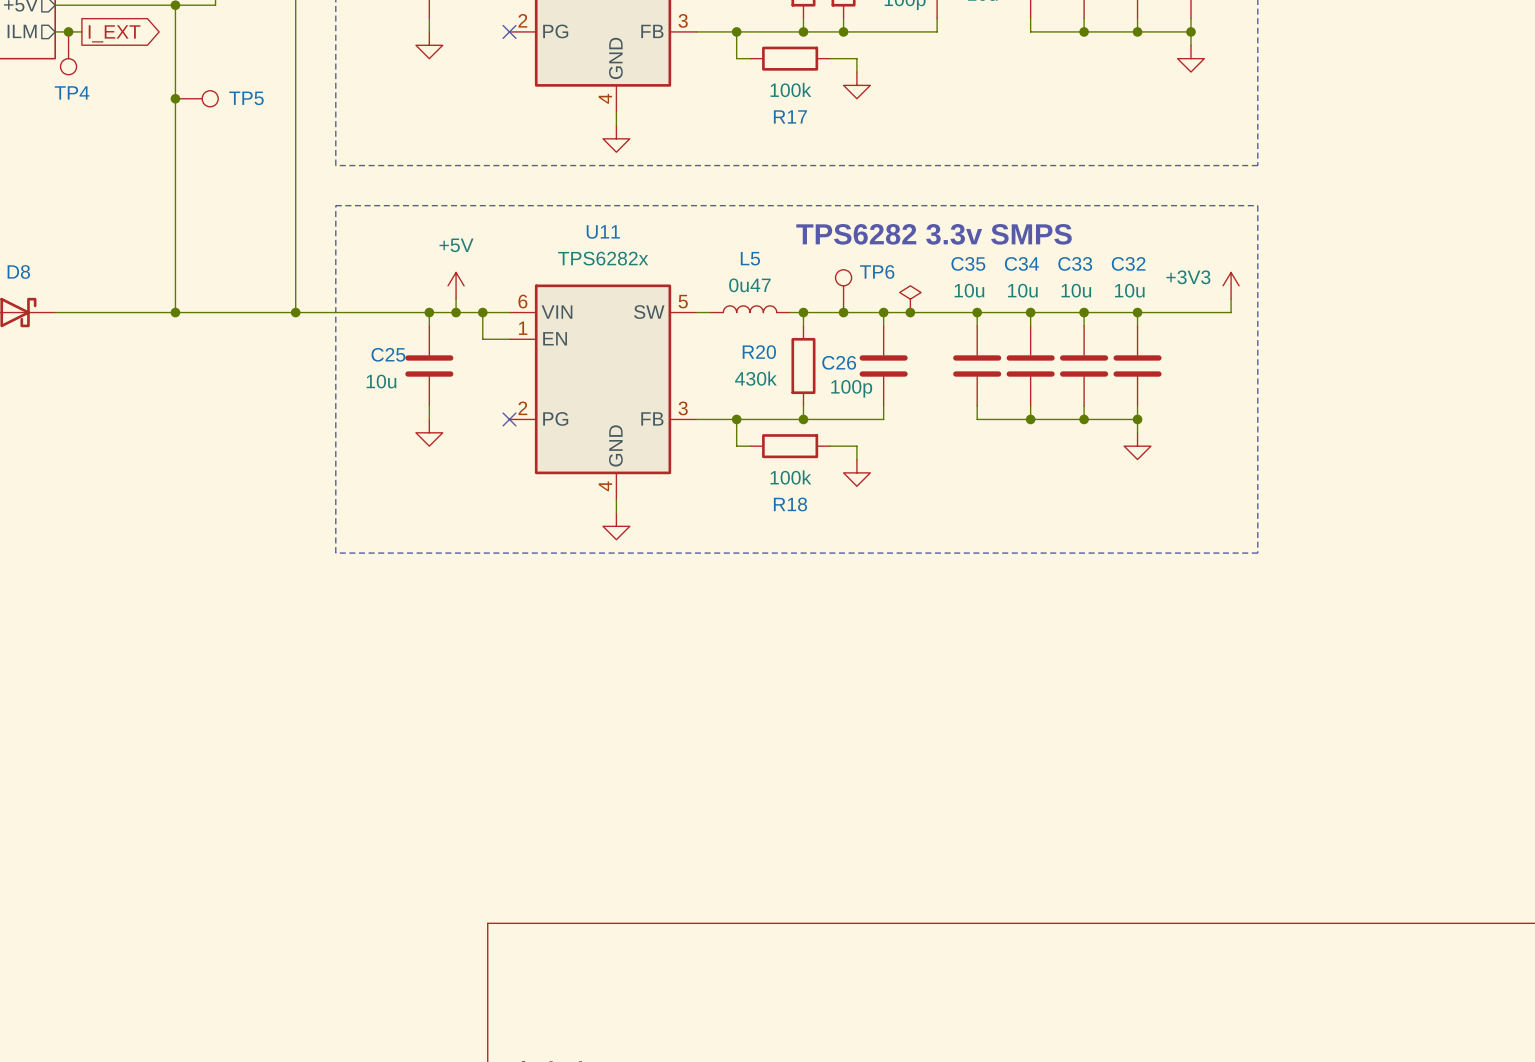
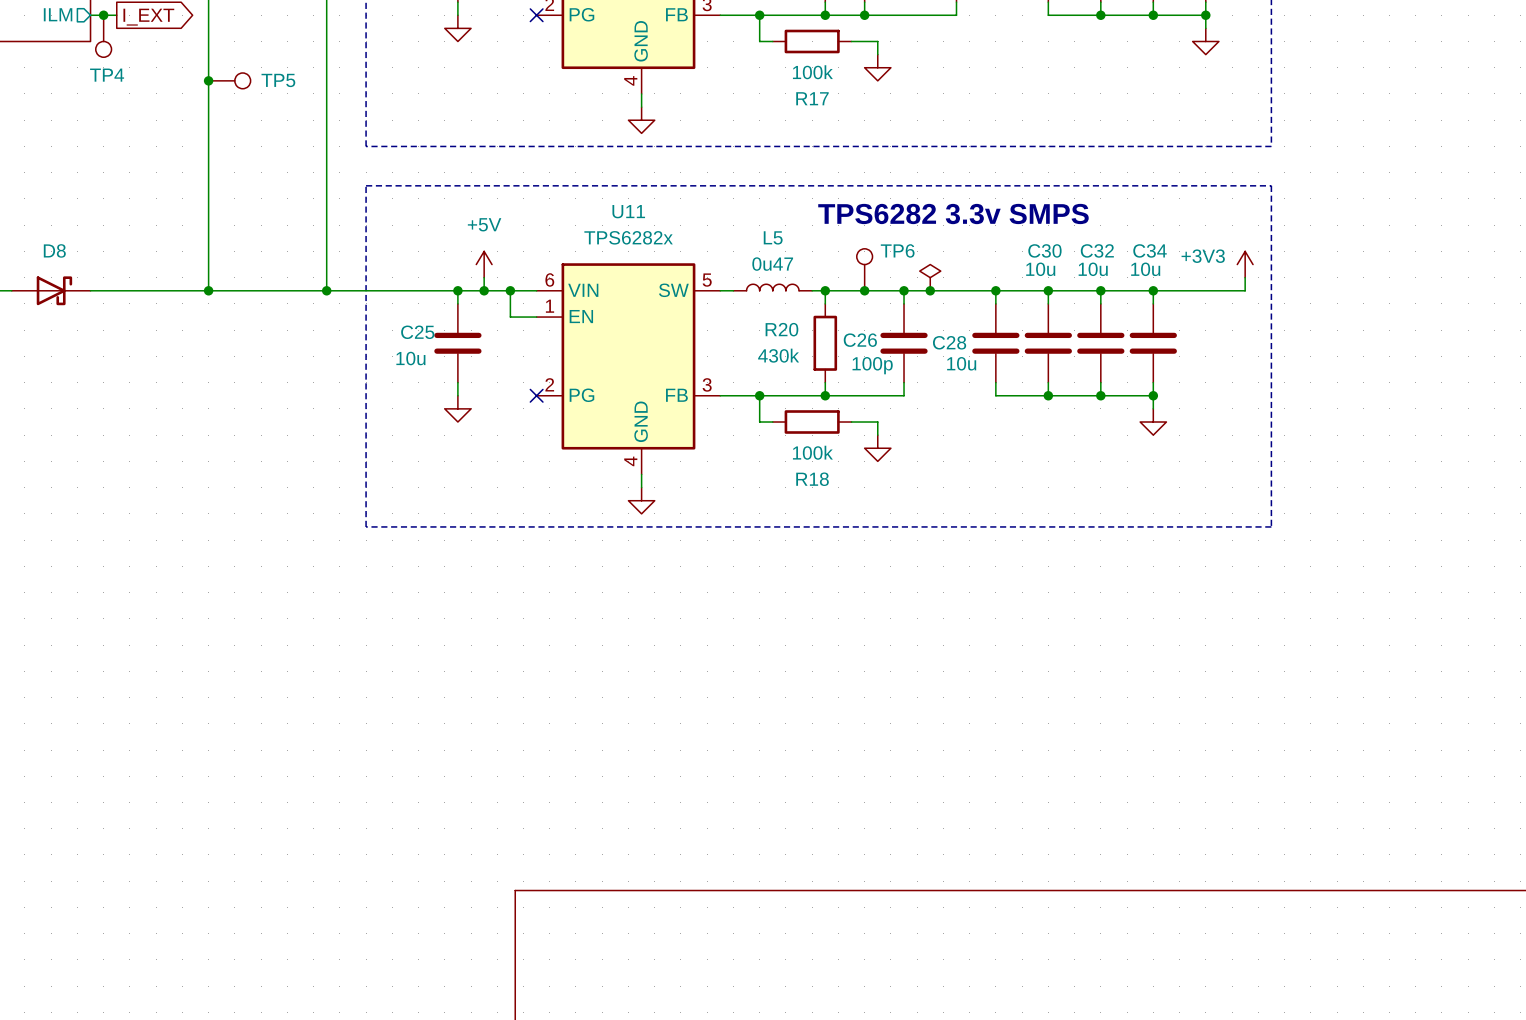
C35 name: C35 (968, 263) -> C28 (949, 342)
C34 name: C34 (1021, 263) -> C30 (1044, 250)
C33 name: C33 (1075, 263) -> C32 (1097, 250)
C32 name: C32 (1128, 263) -> C34 (1150, 250)
C35 value position: 10u (969, 290) -> 10u (961, 363)

